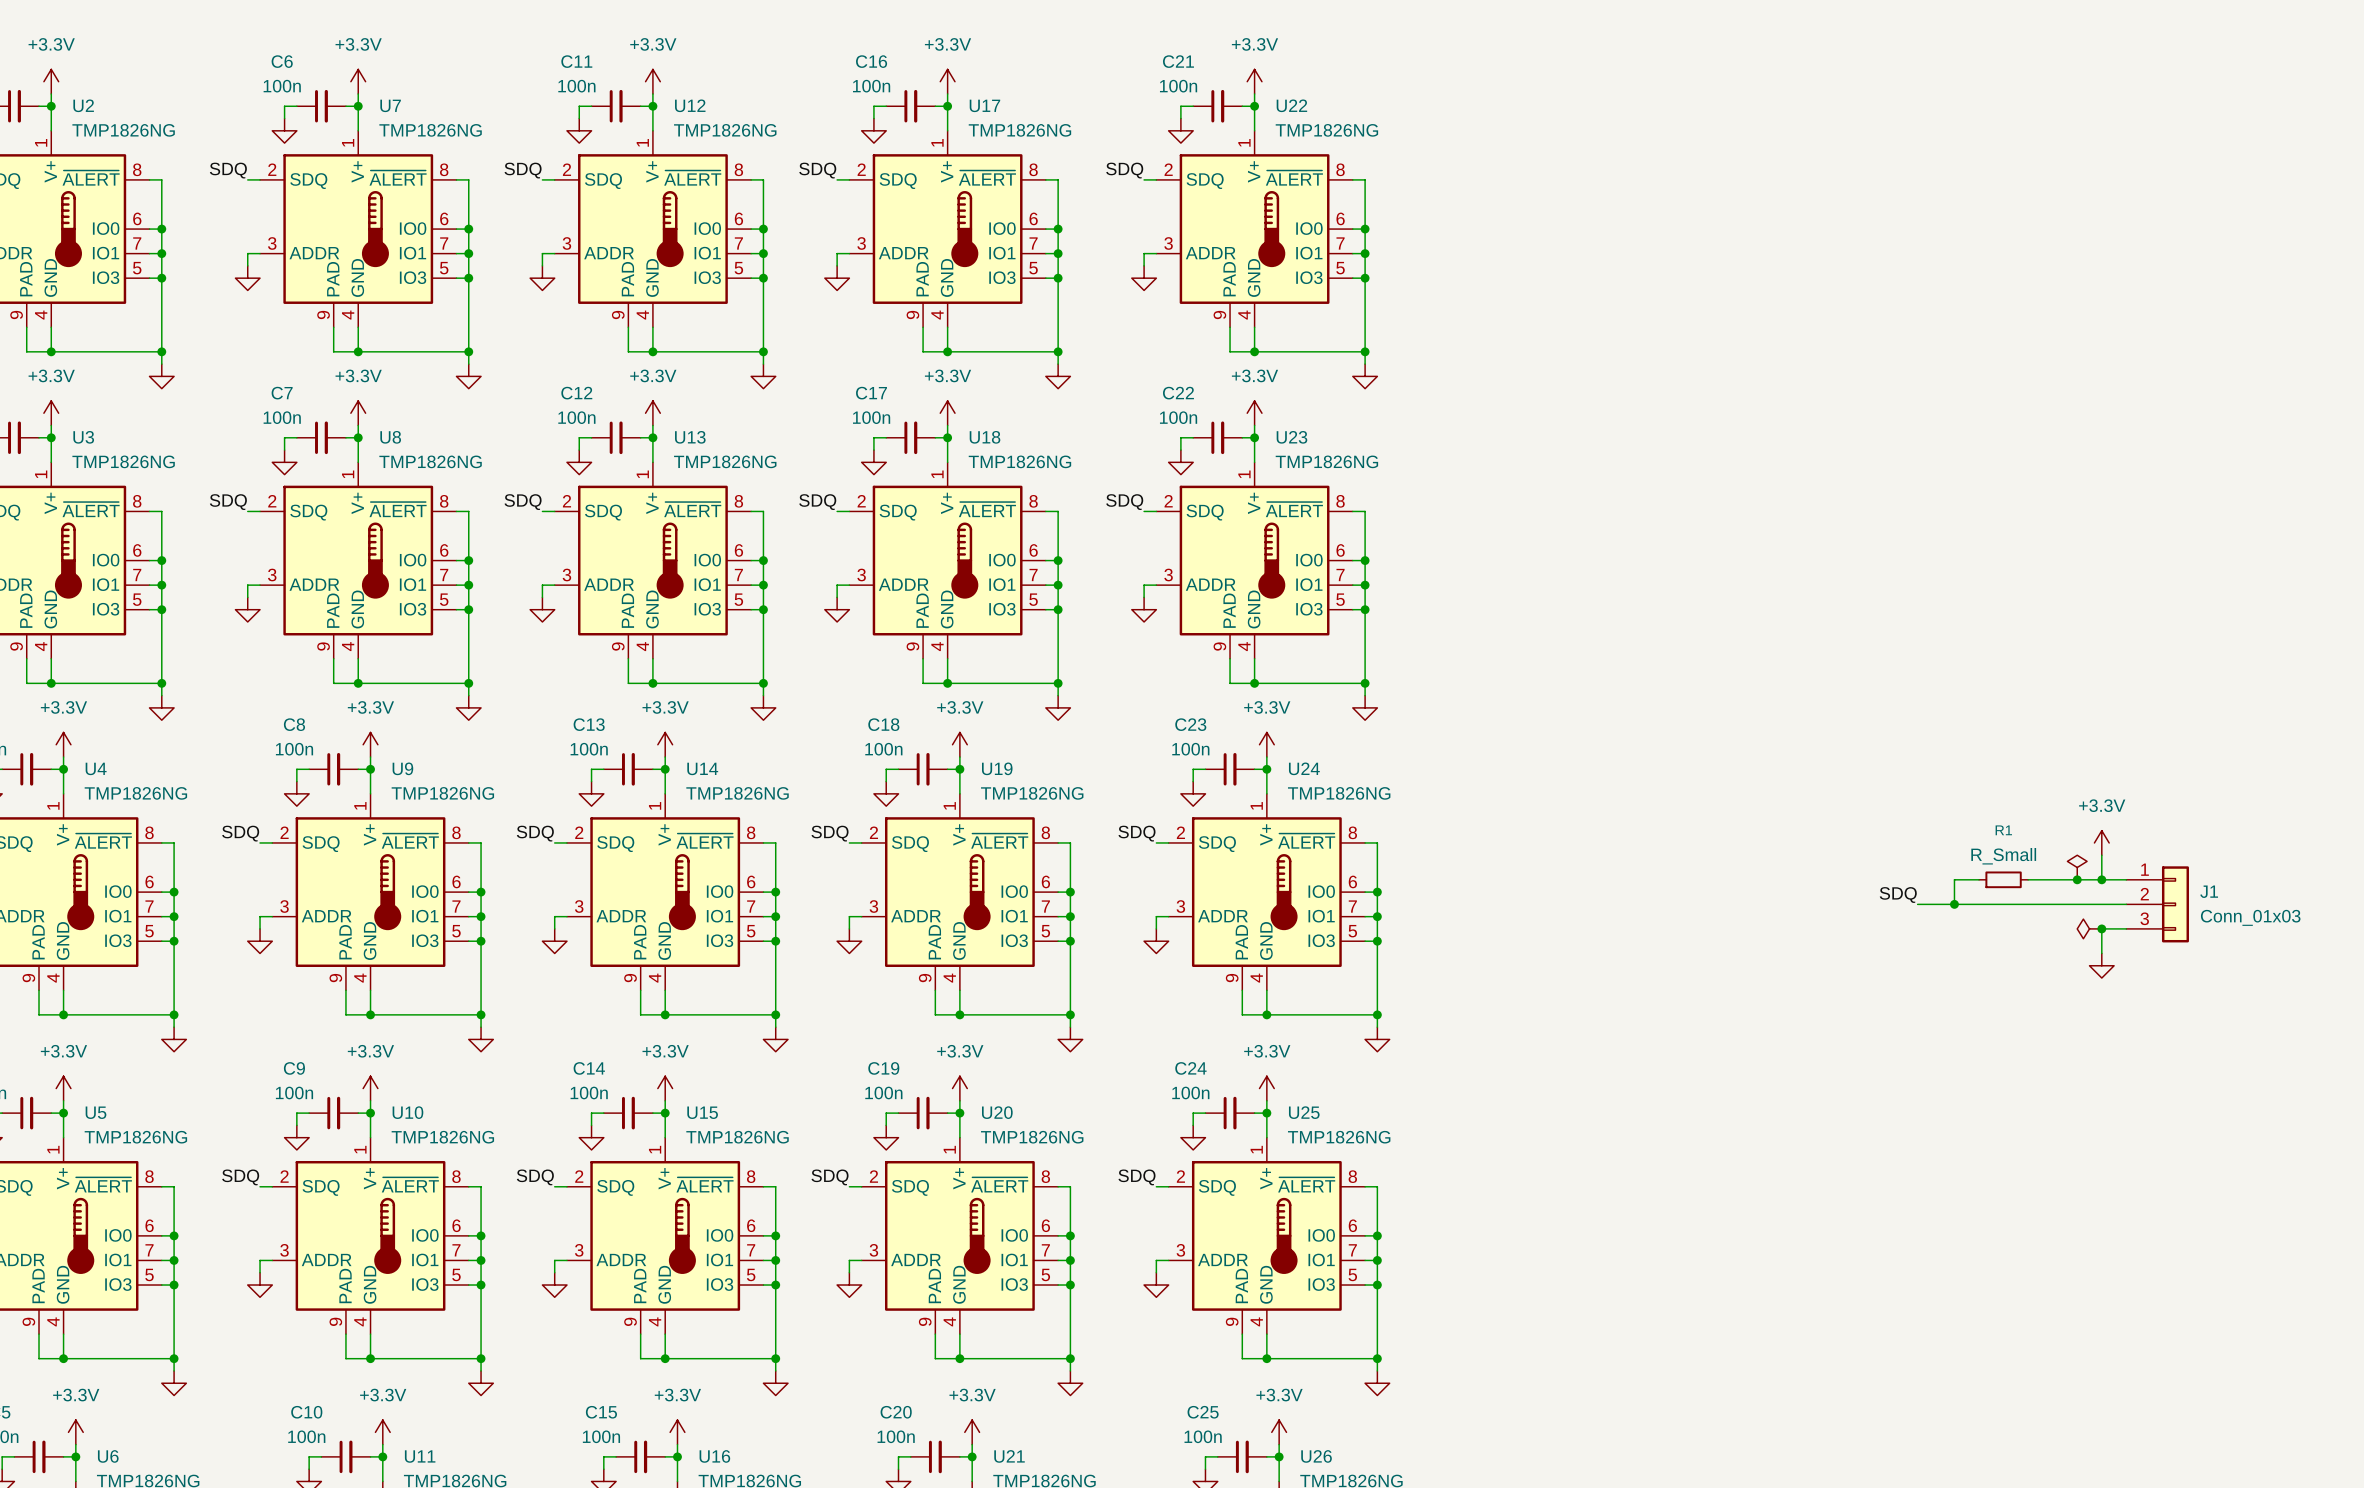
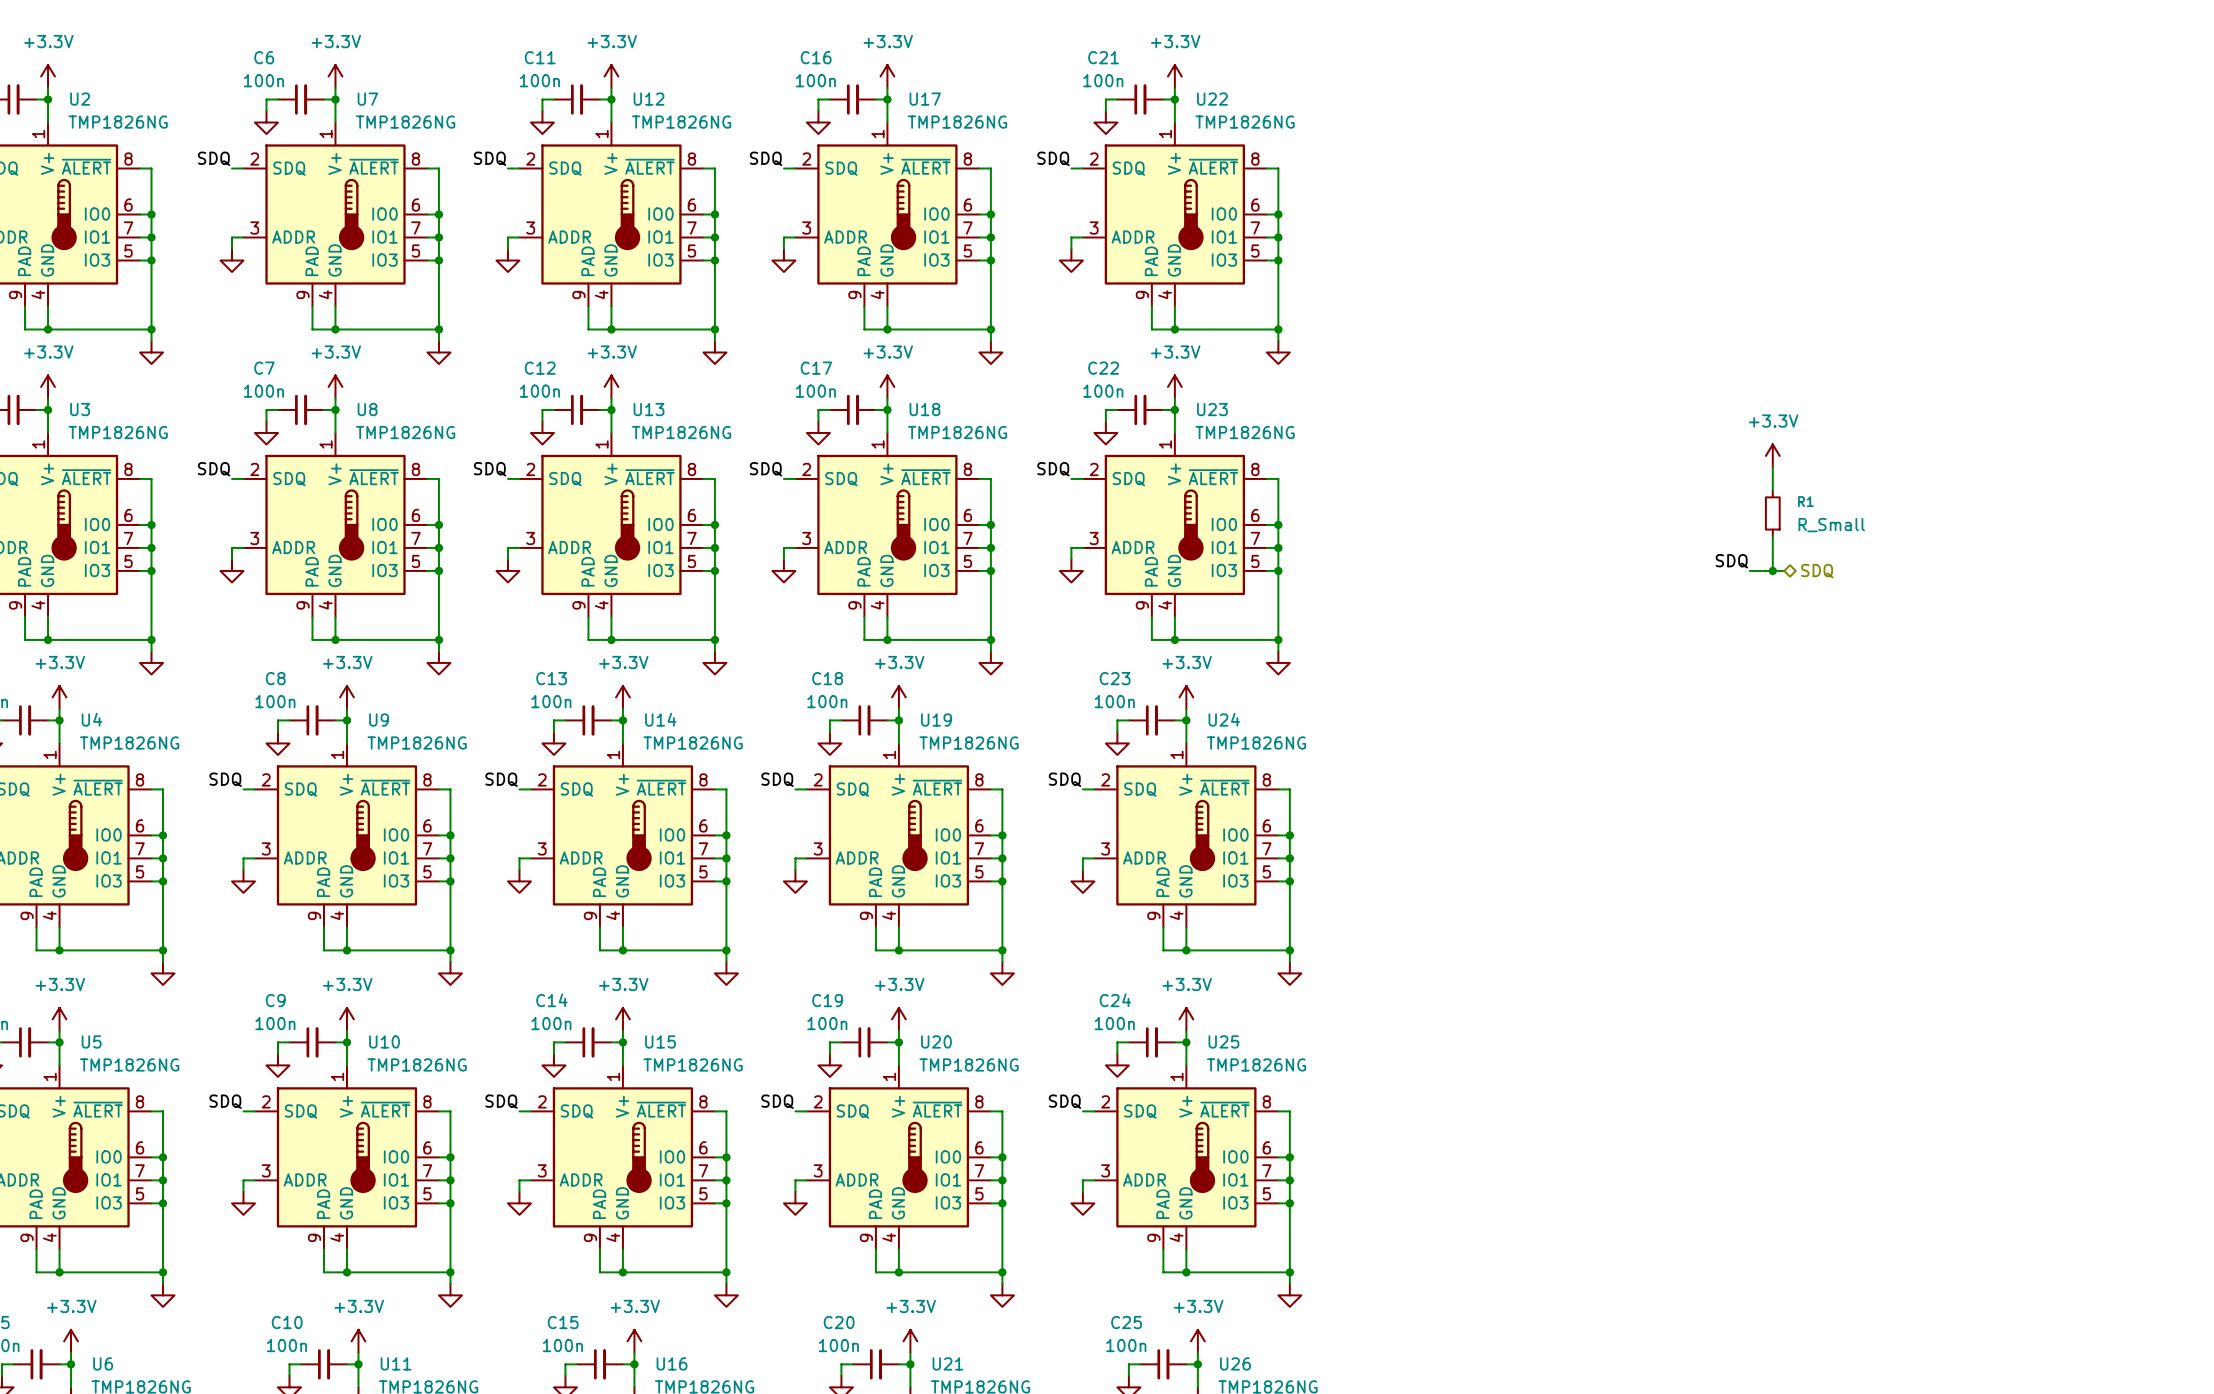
power symbol: none -> +3.3V (1772, 455)
wire: none -> (1772, 467) (1772, 490)
wire: none -> (1772, 536) (1772, 570)
label: none -> SDQ (1731, 561)
wire: none -> (1749, 570) (1784, 570)
junction: none -> (1772, 570)
hierarchical label: none -> SDQ (1817, 571)
power symbol: +3.3V (2101, 842) -> none
wire: (2101, 855) (2101, 879) -> none
R1 value position: R_Small (2003, 856) -> R_Small (1831, 525)
power symbol: (2077, 867) -> none
wire: (1979, 879) (1954, 879) (1954, 904) -> none
R1 rotation: 0° (2003, 879) -> 90° clockwise (1772, 513)
R1 position: (2003, 879) -> (1772, 513)
wire: (2028, 879) (2126, 879) -> none
junction: (2077, 879) -> none
junction: (2101, 879) -> none
label: SDQ (1898, 895) -> none
wire: (1917, 904) (2126, 904) -> none
junction: (1954, 904) -> none
J1: Conn_01x03 (2157, 904) -> none
power symbol: (2089, 928) -> none
junction: (2101, 928) -> none
wire: (2126, 928) (2101, 928) (2101, 953) -> none
power symbol: (2101, 965) -> none

